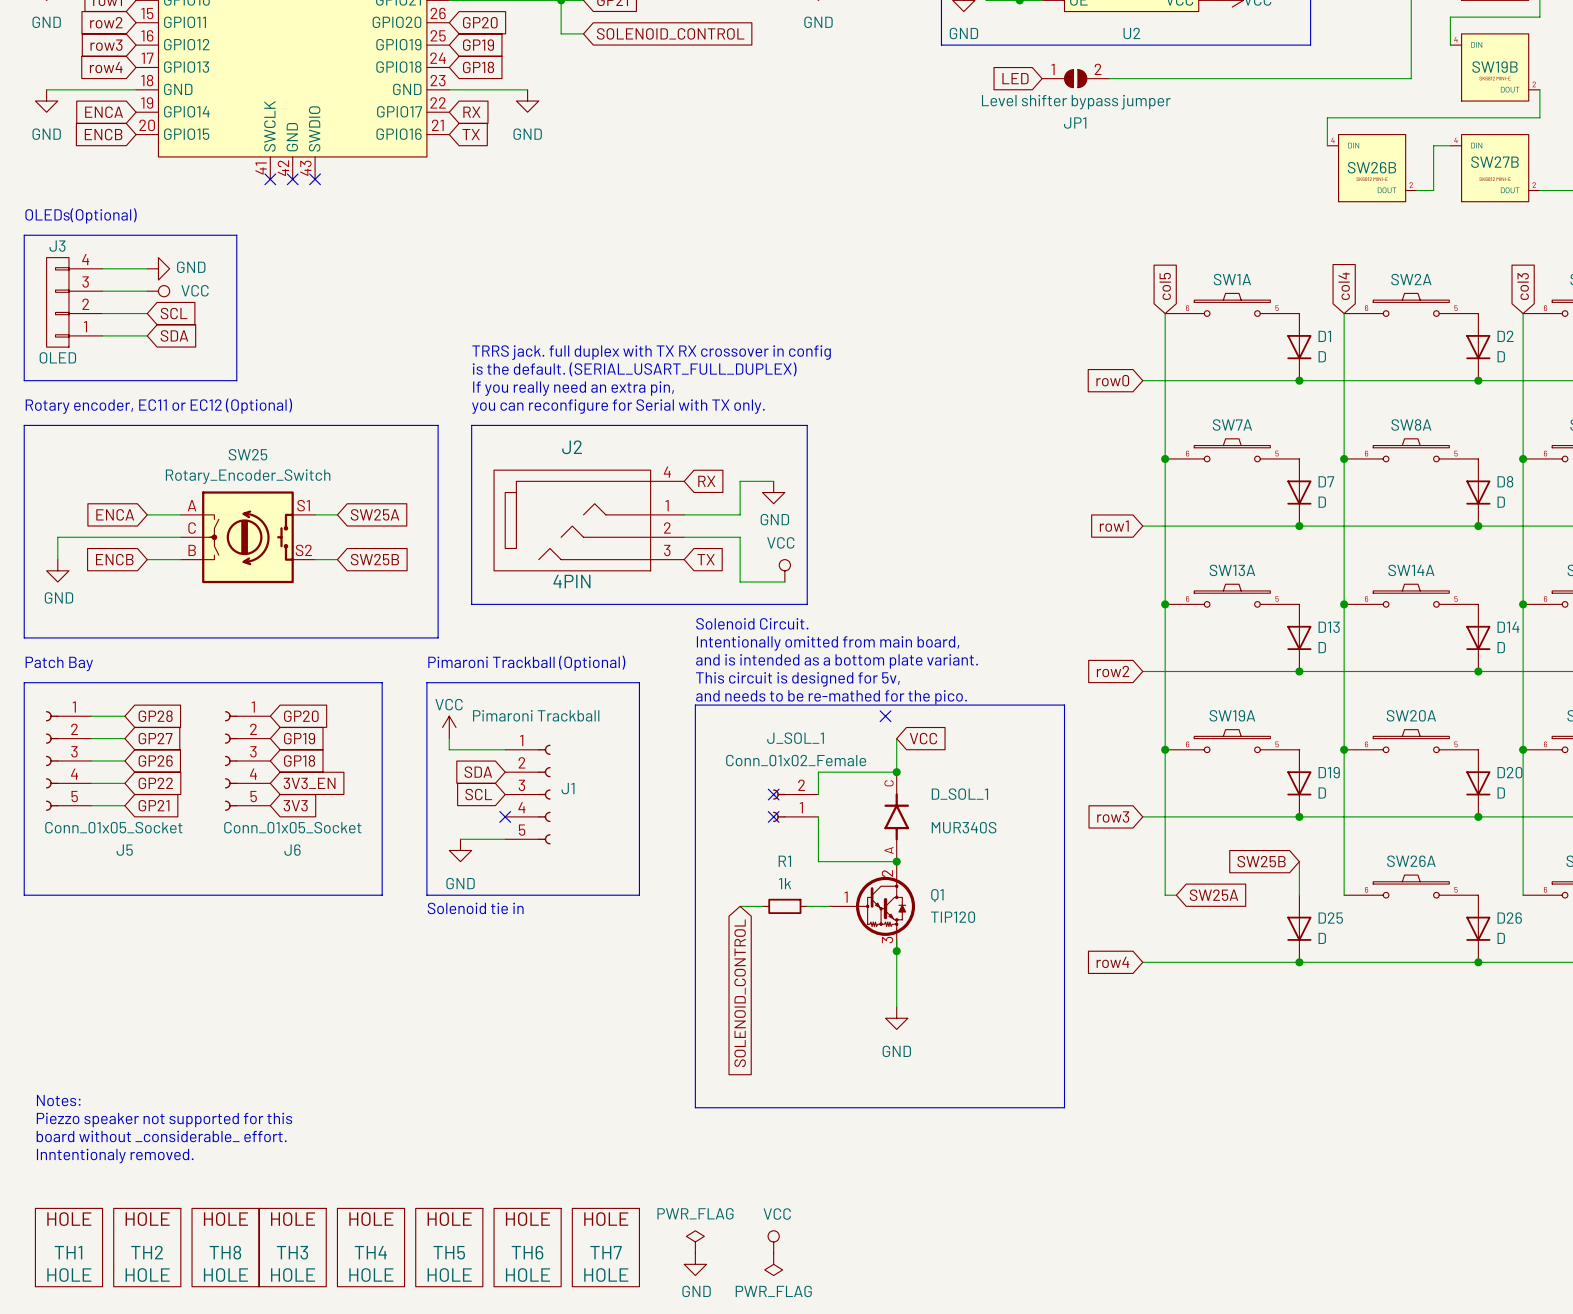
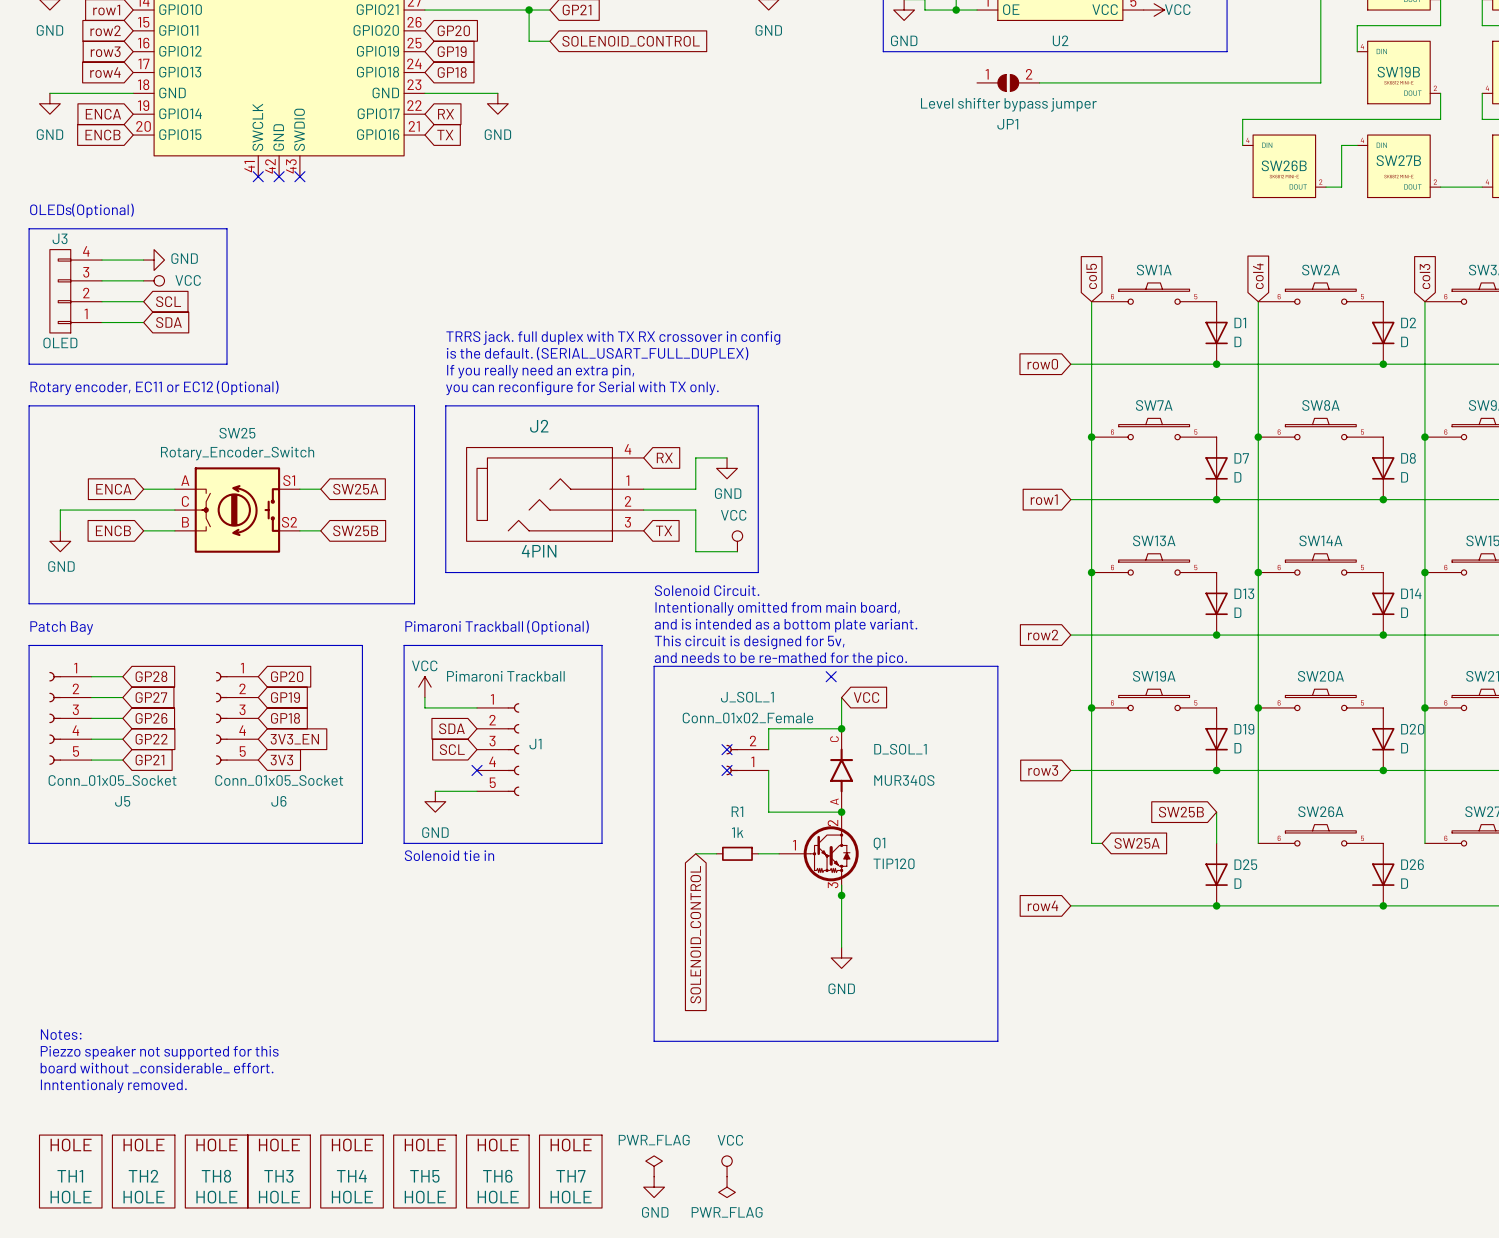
global label: LED (1015, 78) -> none

